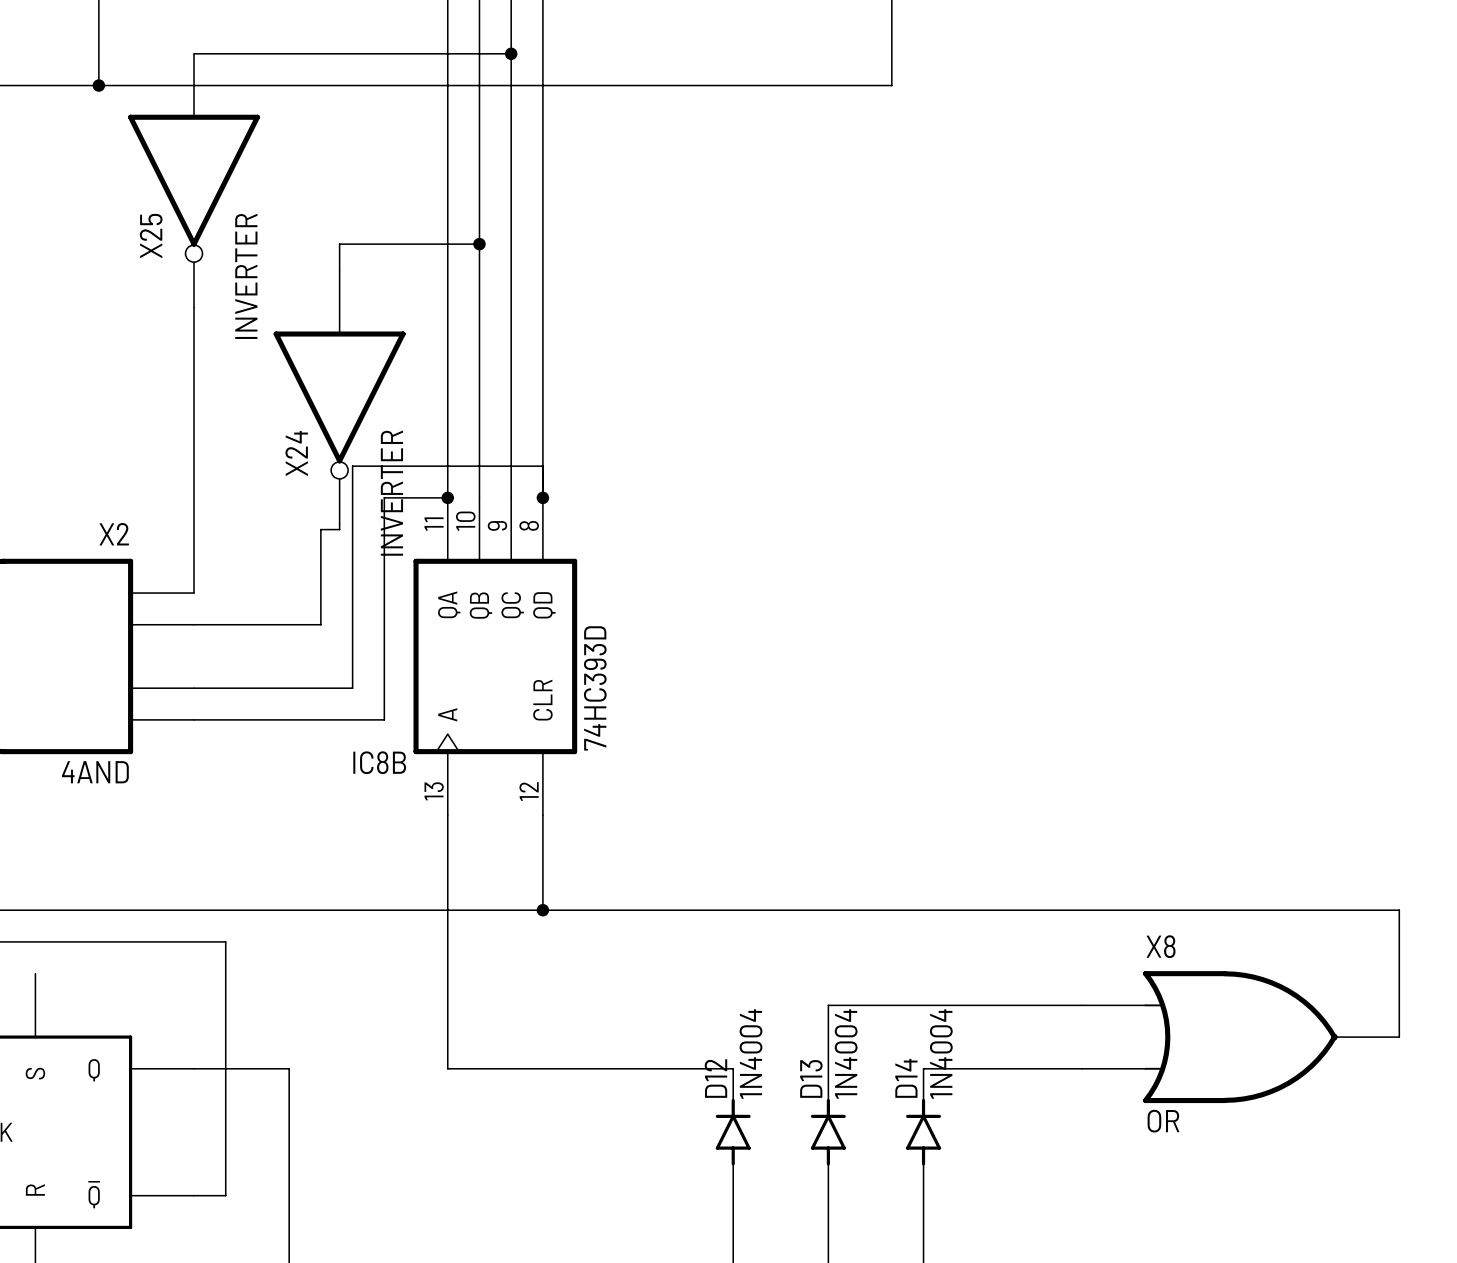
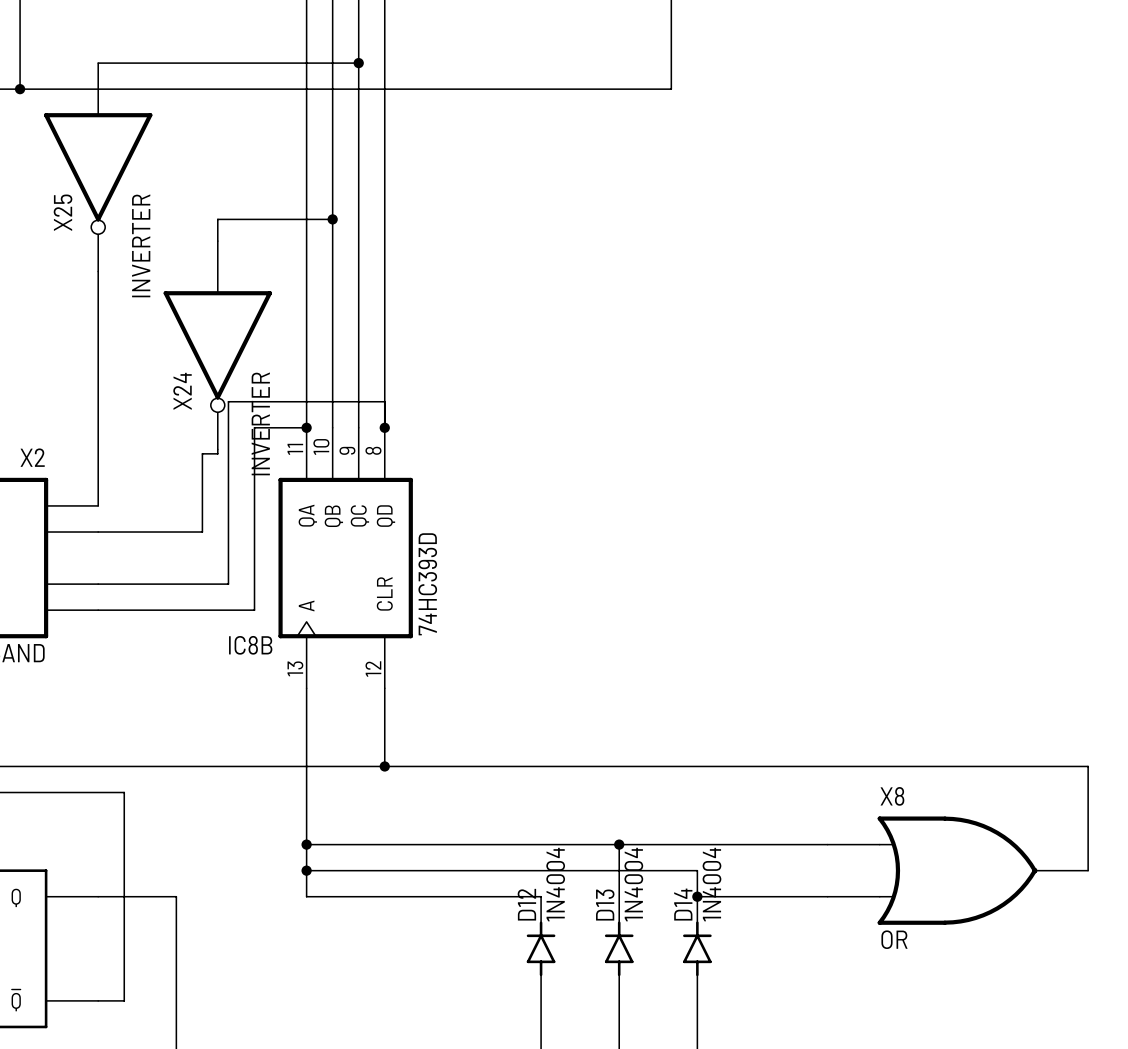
wire: none -> (306, 844) (619, 844)
junction: none -> (306, 844)
junction: none -> (619, 844)
wire: none -> (306, 870) (697, 870) (697, 896)
junction: none -> (306, 870)
junction: none -> (697, 896)

